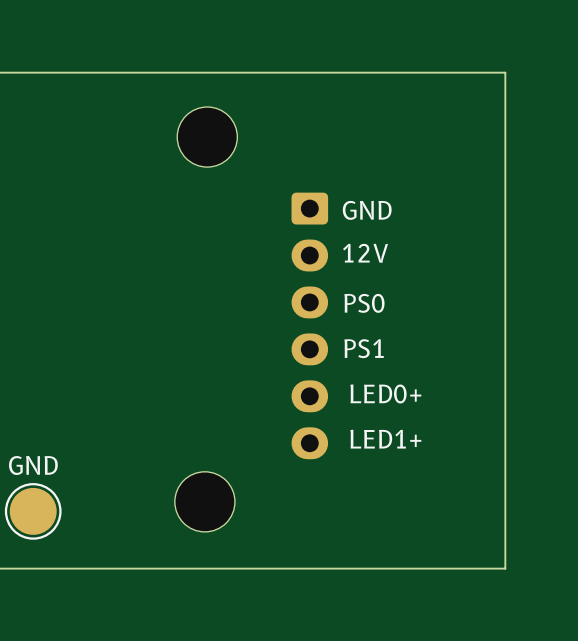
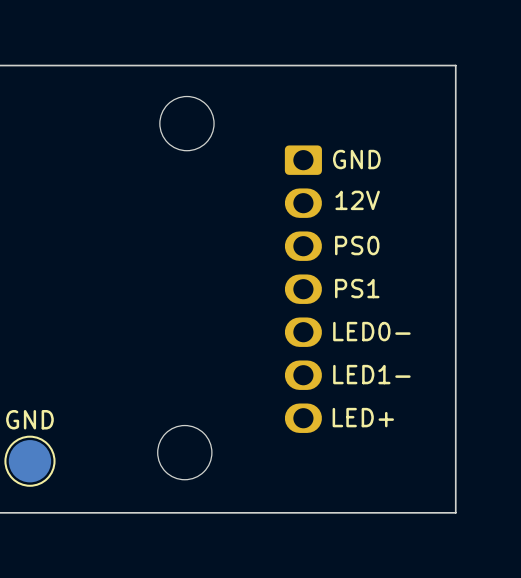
text position: GND (367, 210) -> GND (356, 159)
text position: 12V (365, 253) -> 12V (357, 200)
text position: PS0 (364, 303) -> PS0 (357, 245)
part: none -> (303, 289)
part: (309, 325) -> none
text position: PS1 (364, 348) -> PS1 (357, 288)
text: LED0+ (385, 393) -> LED0- (371, 331)
text: none -> LED1- (371, 374)
text: LED1+ (385, 439) -> none
text: none -> LED+ (363, 417)

